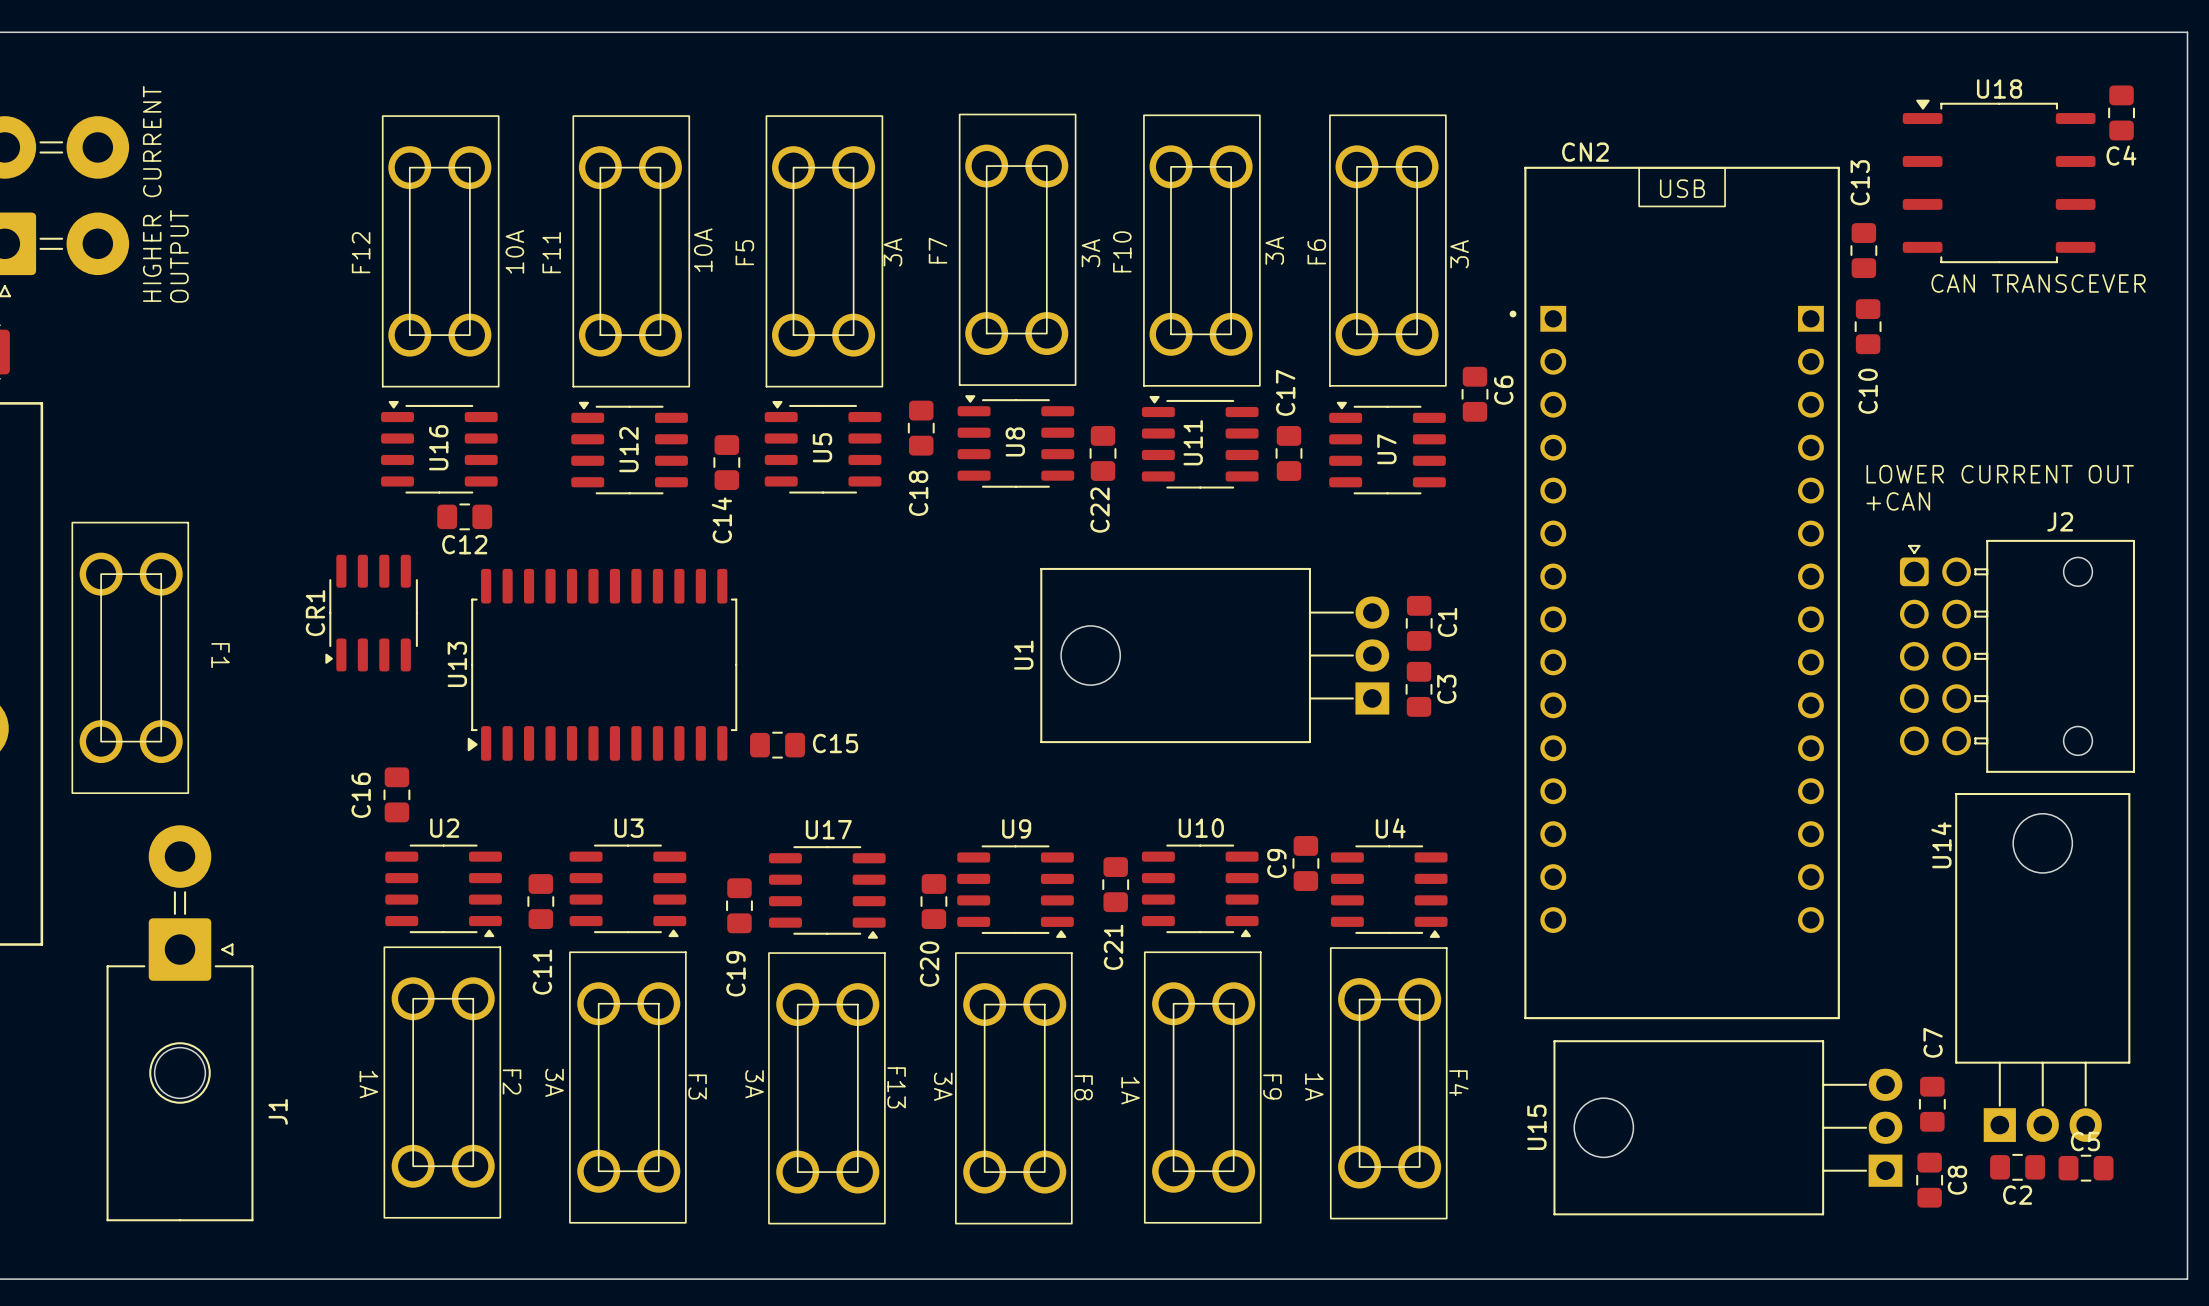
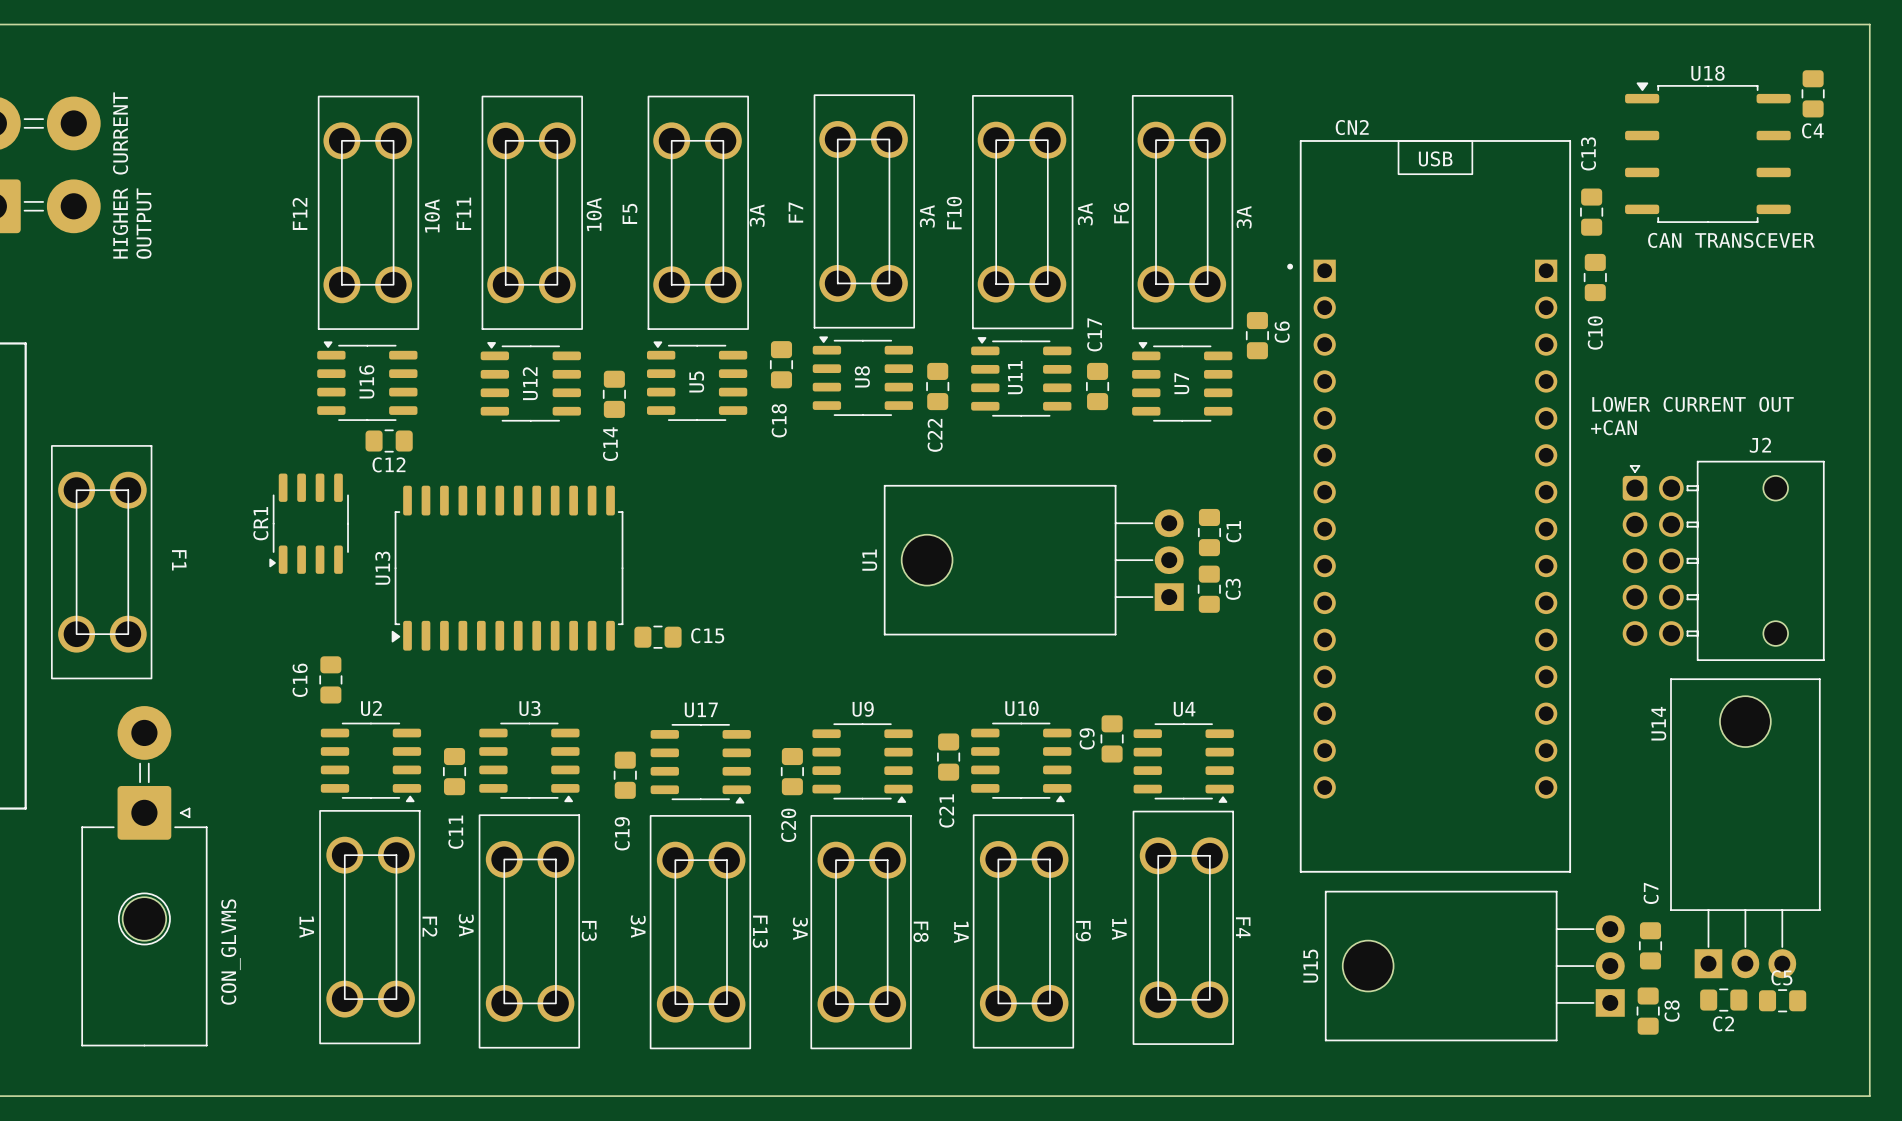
J1 name: J1 (278, 1111) -> CON_GLVMS (230, 952)

